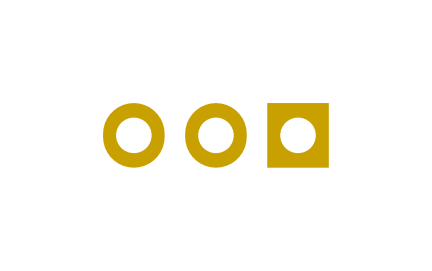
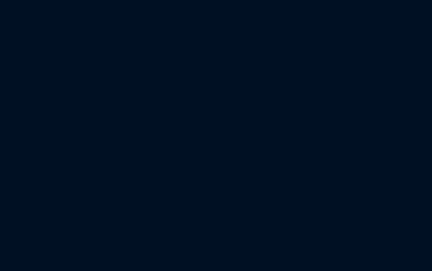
part: (215, 135) -> none

